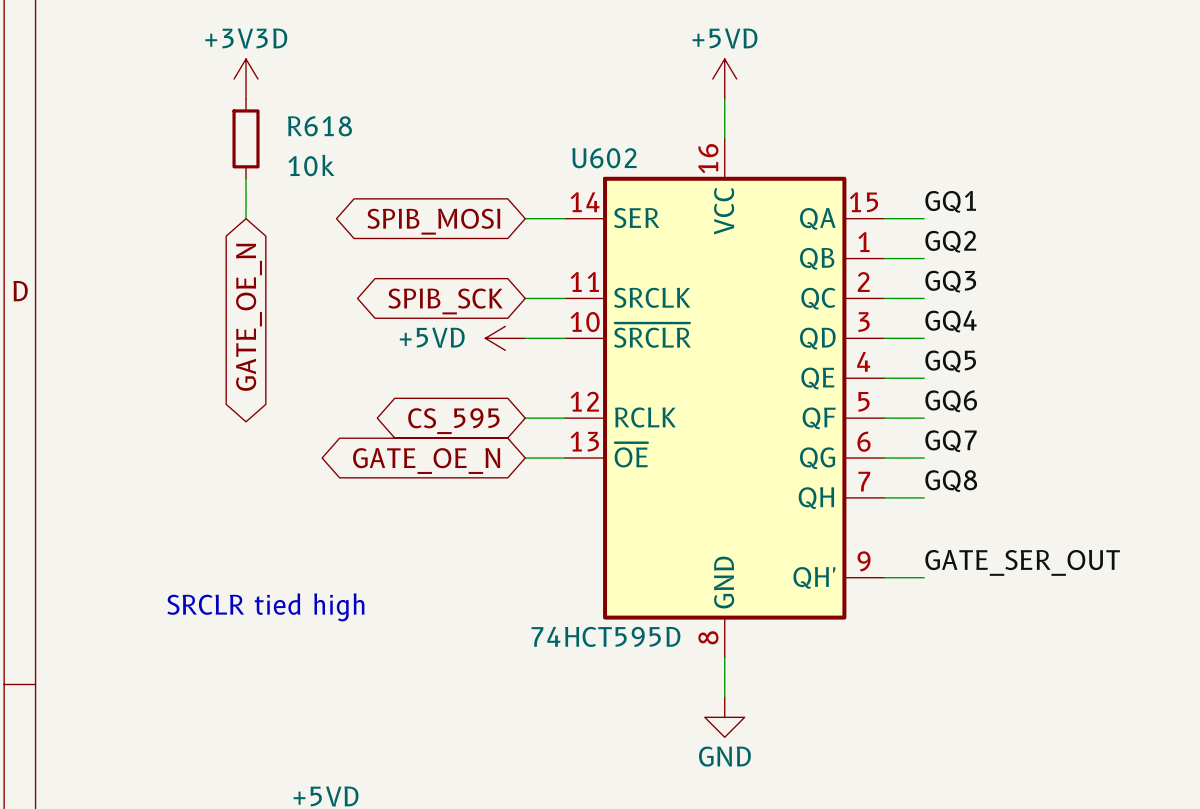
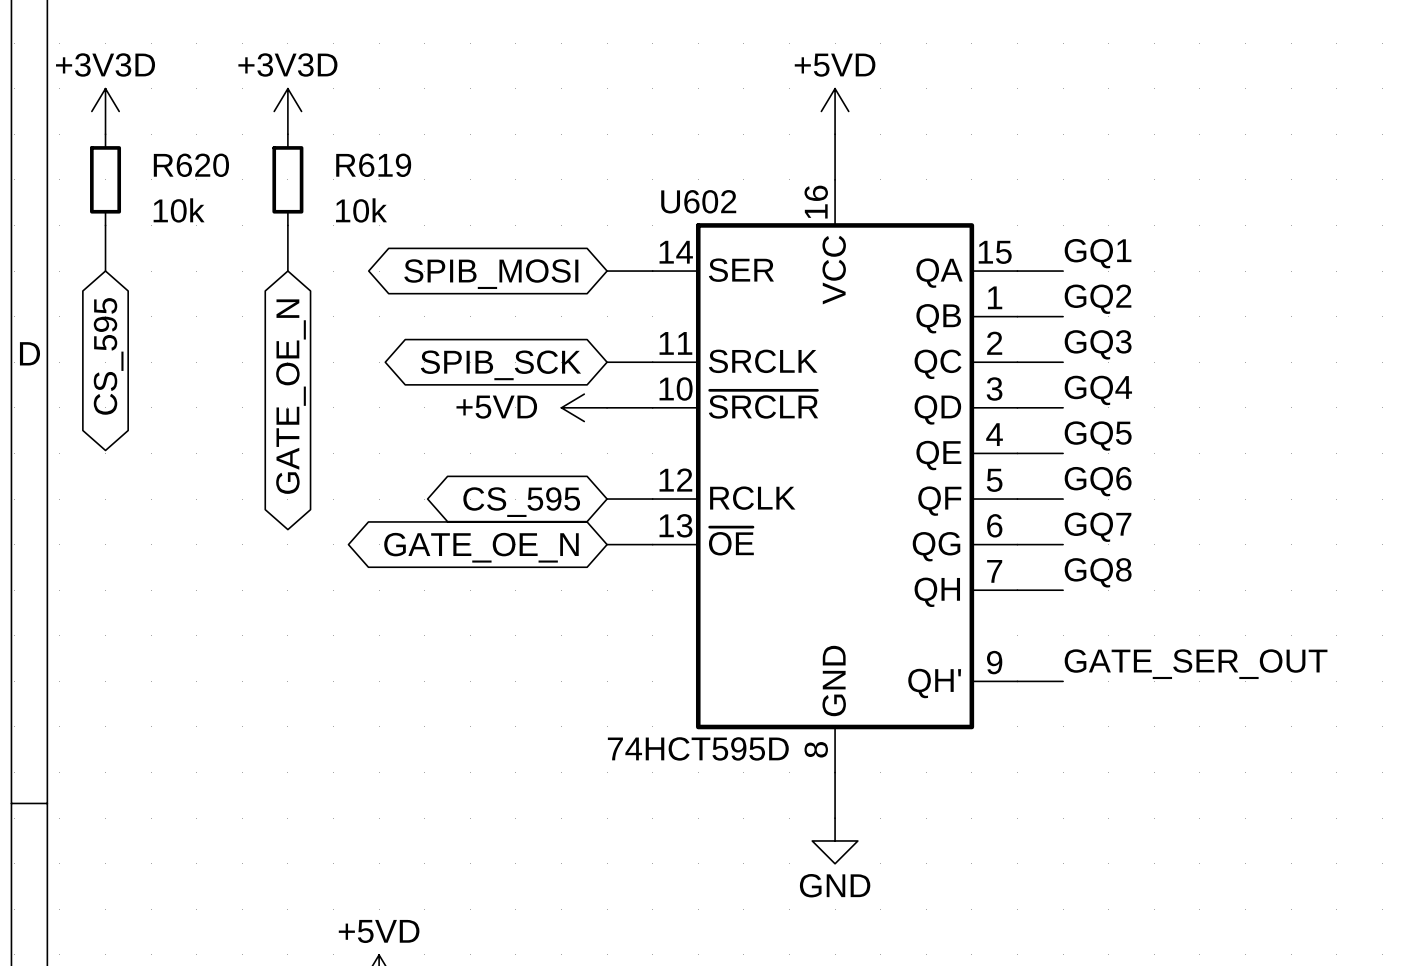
power symbol: none -> +3V3D (105, 111)
R618 name: R618 (319, 126) -> R619 (373, 165)
R620: none -> 10k (105, 179)
wire: none -> (105, 225) (105, 271)
global label: none -> CS_595 (108, 356)
text: SRCLR tied high (265, 607) -> none

